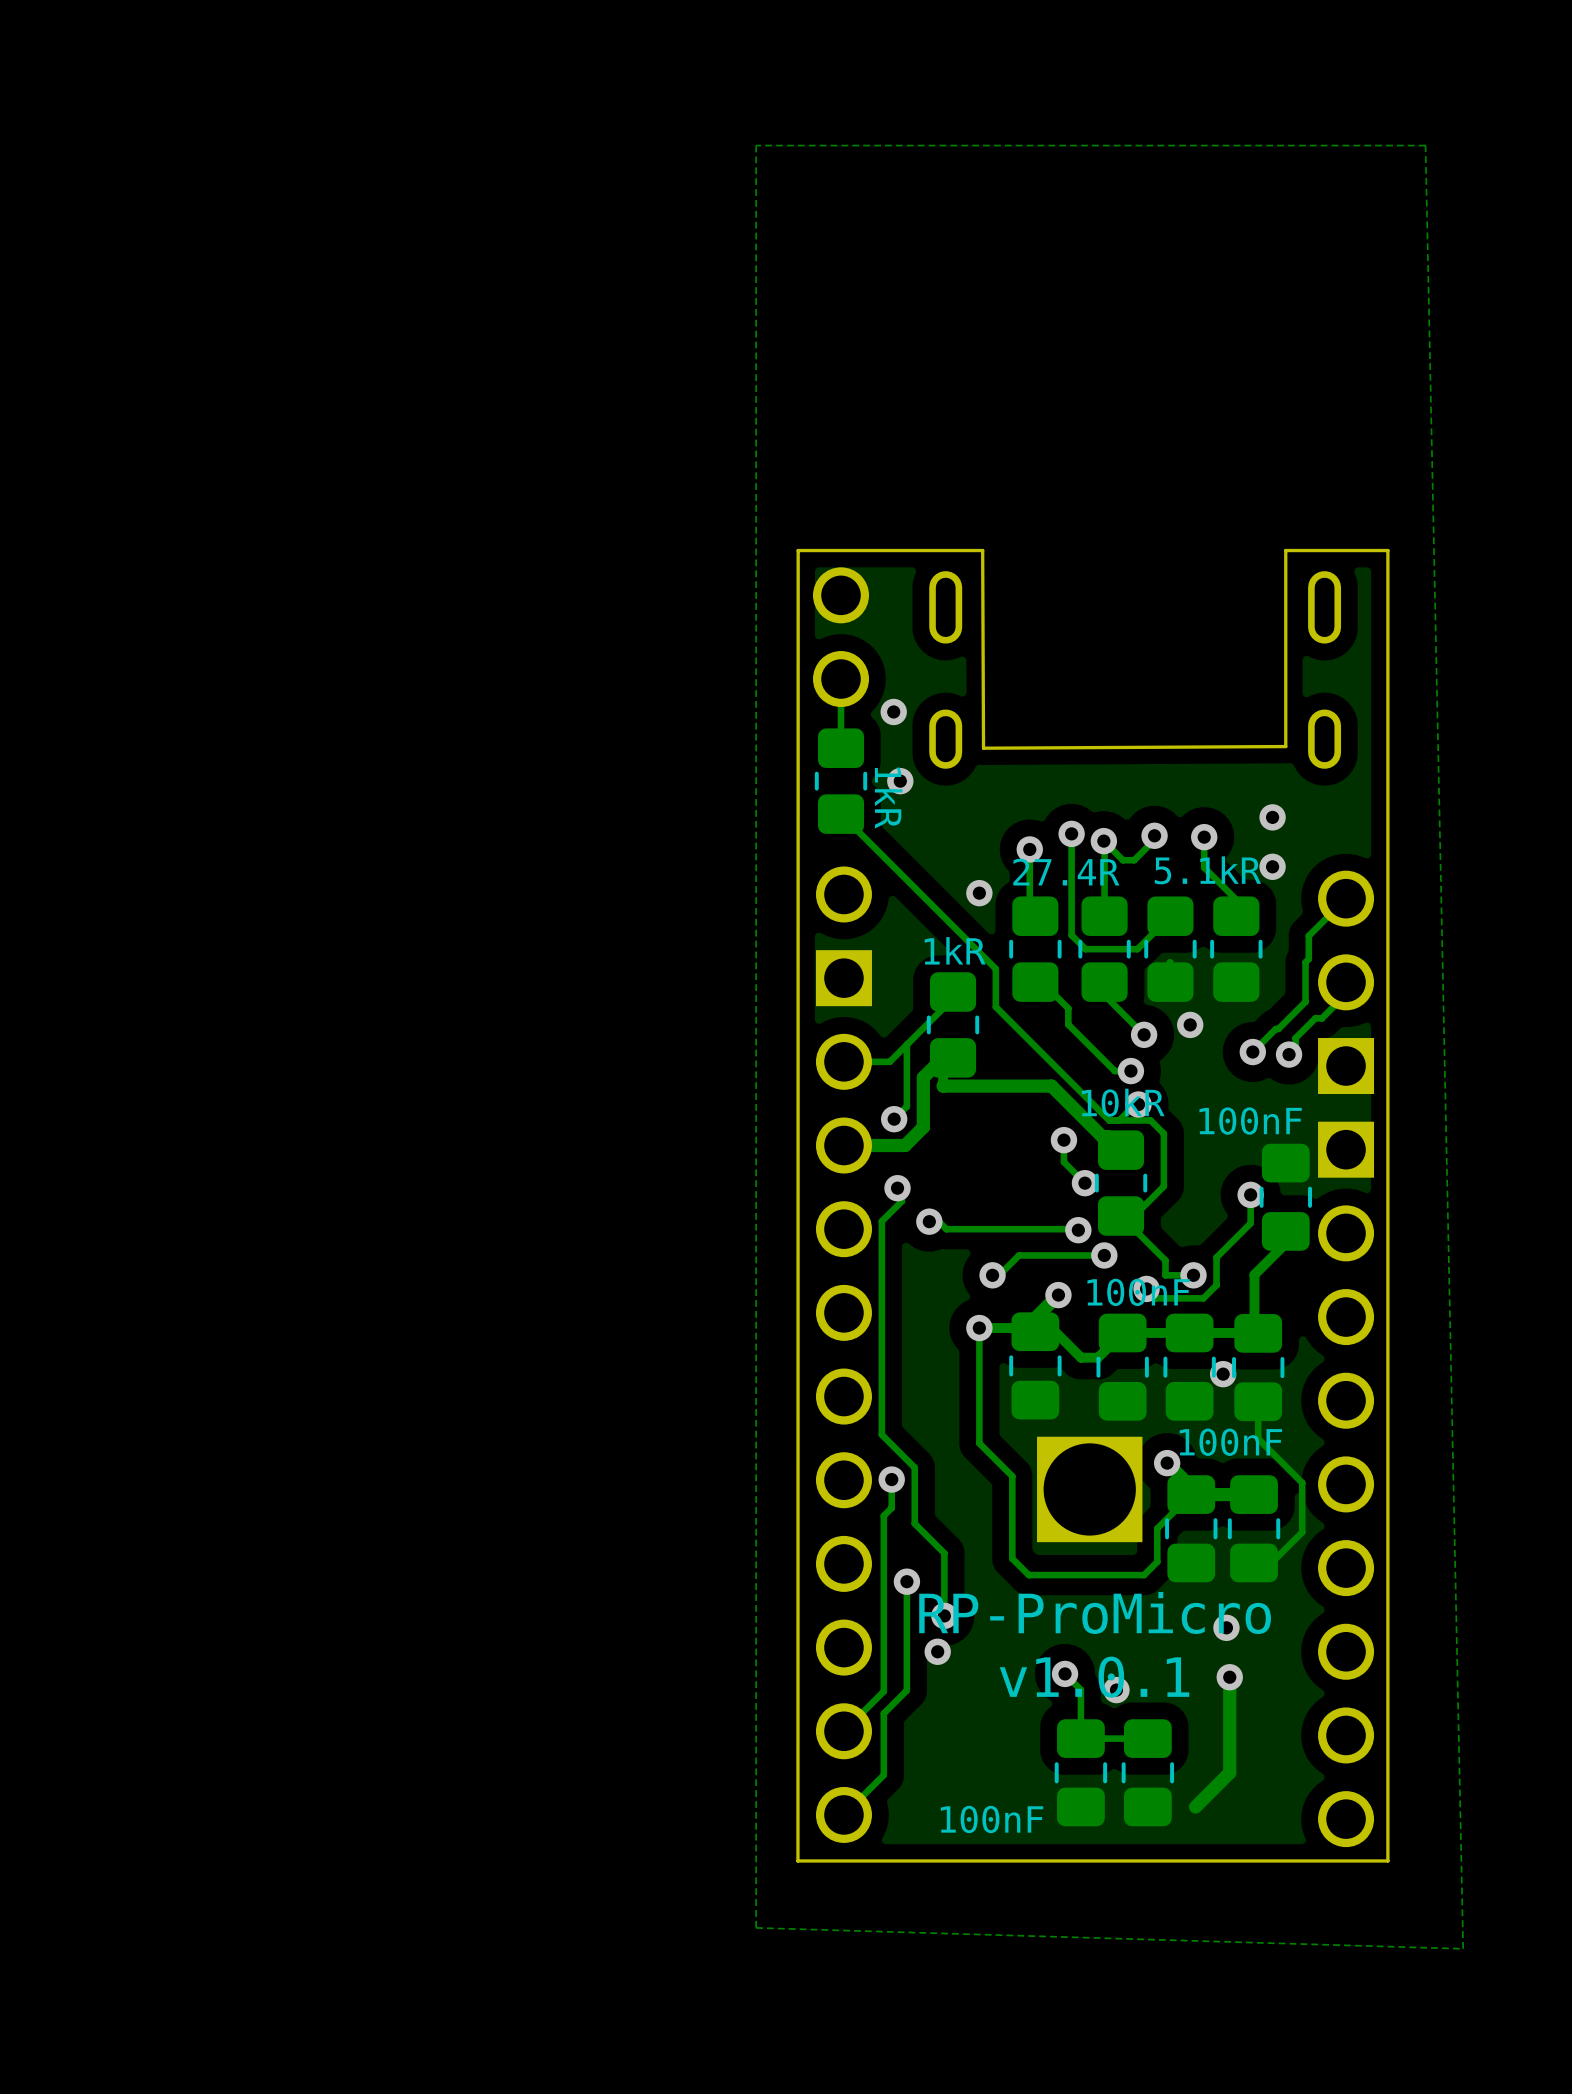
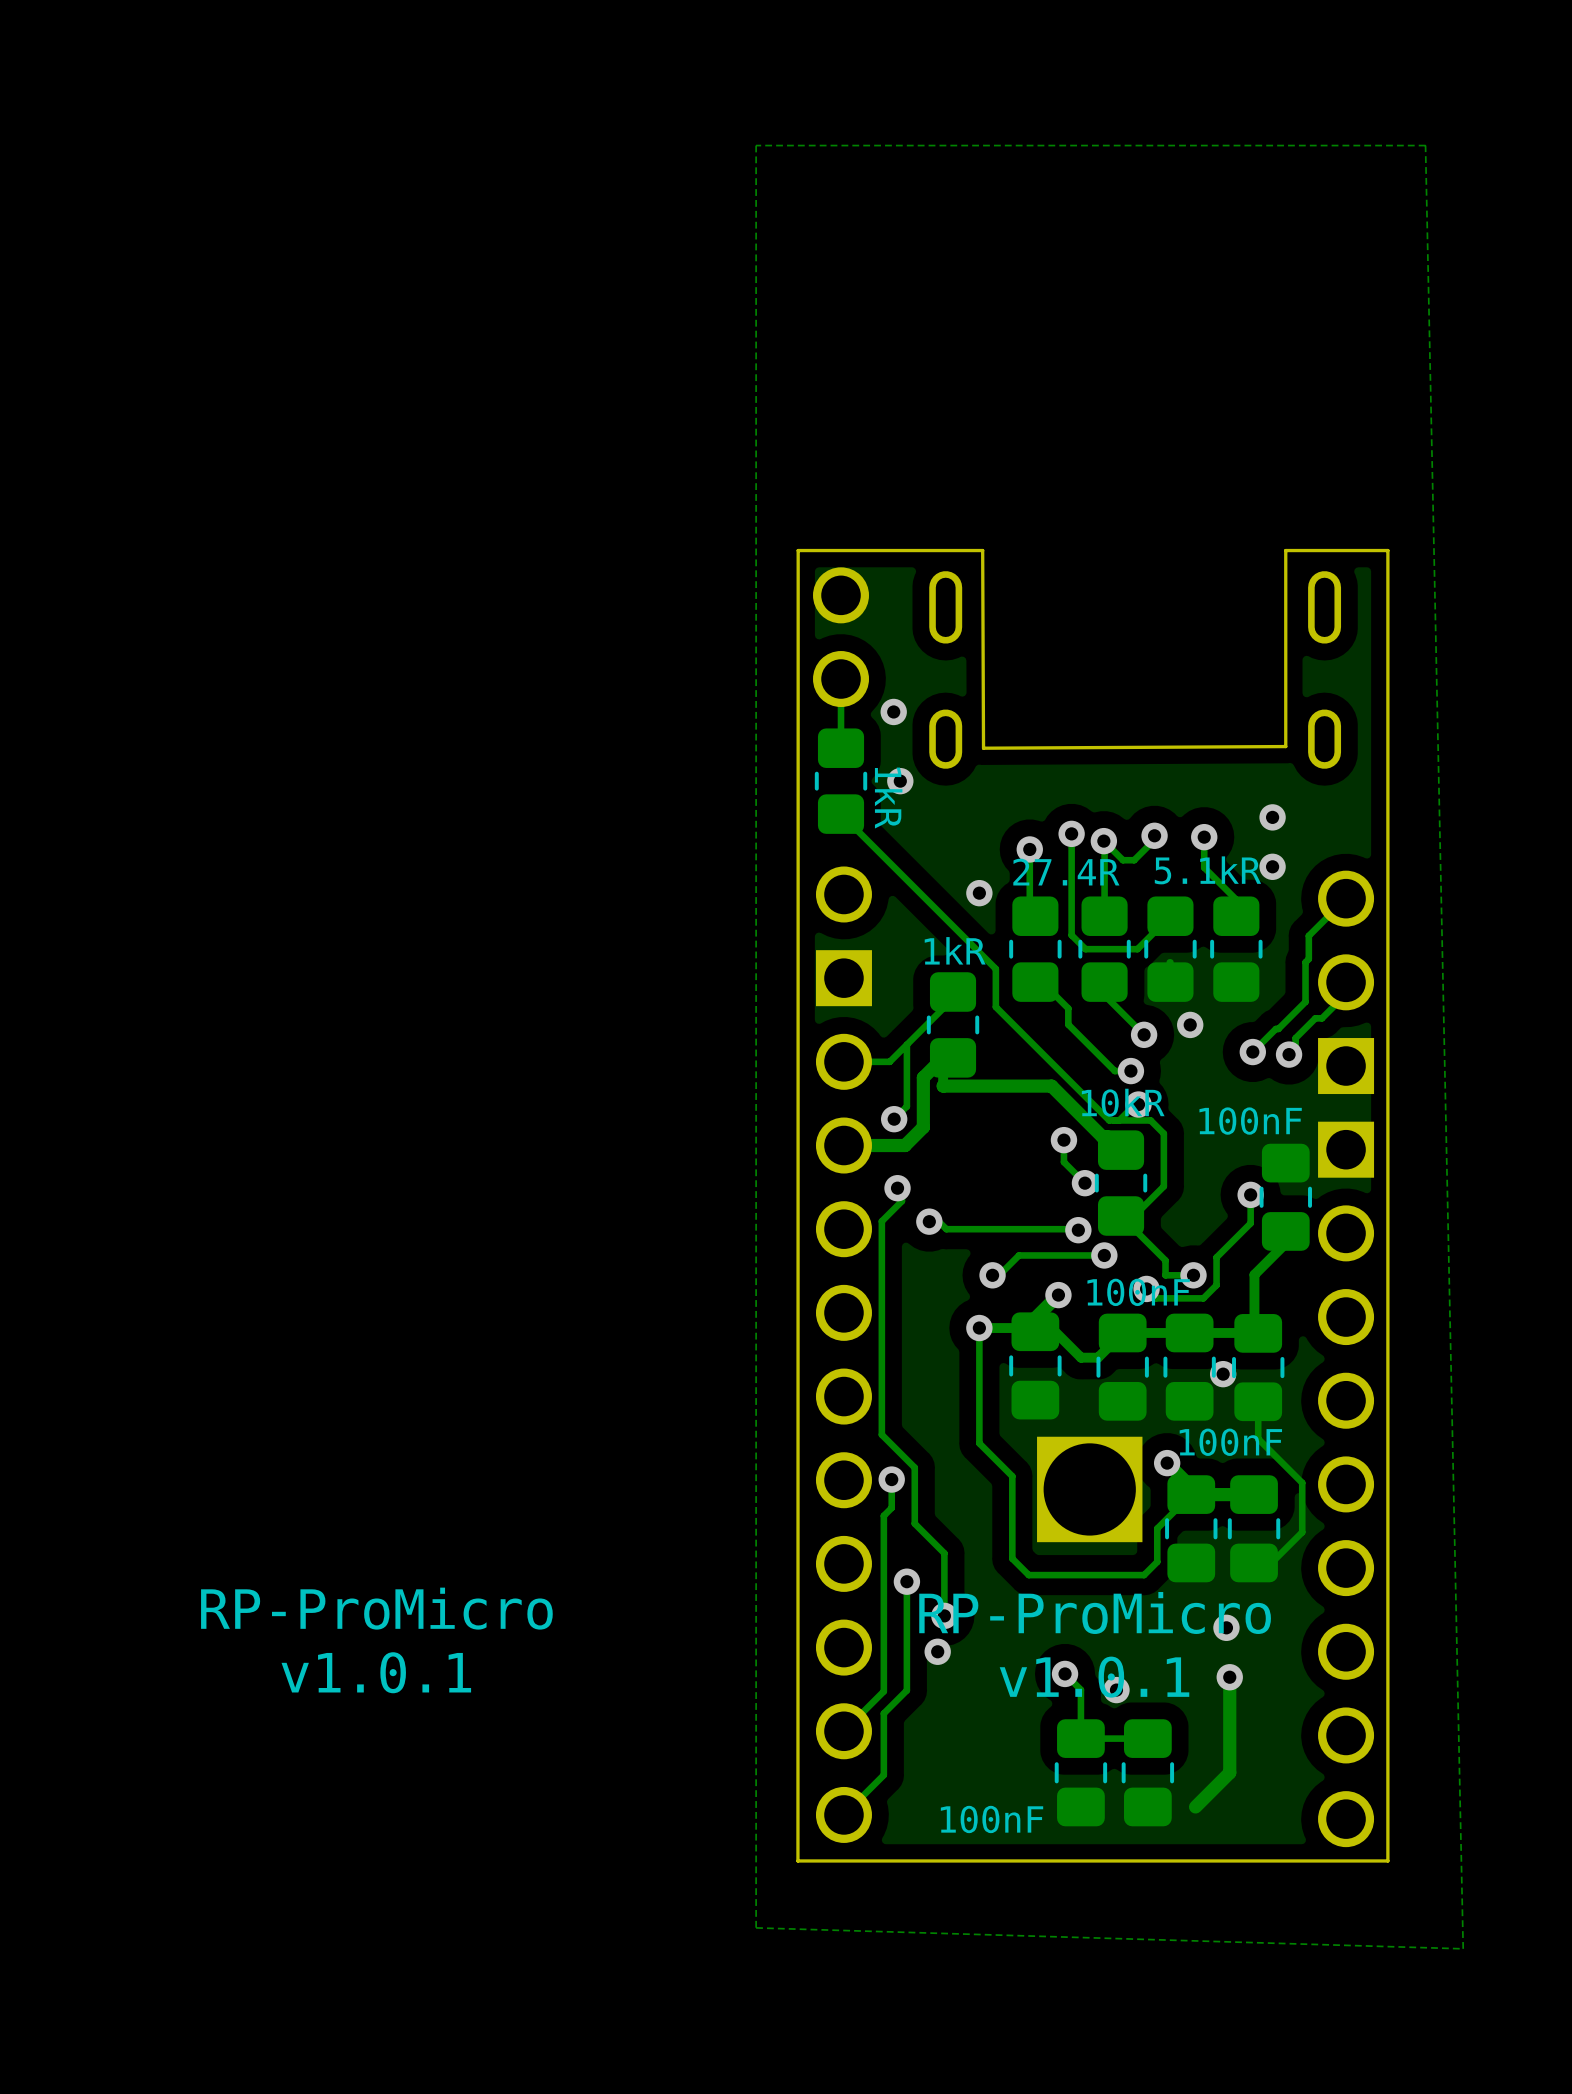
text: none -> RP-ProMicro (376, 1608)
text: none -> v1.0.1 (376, 1672)

